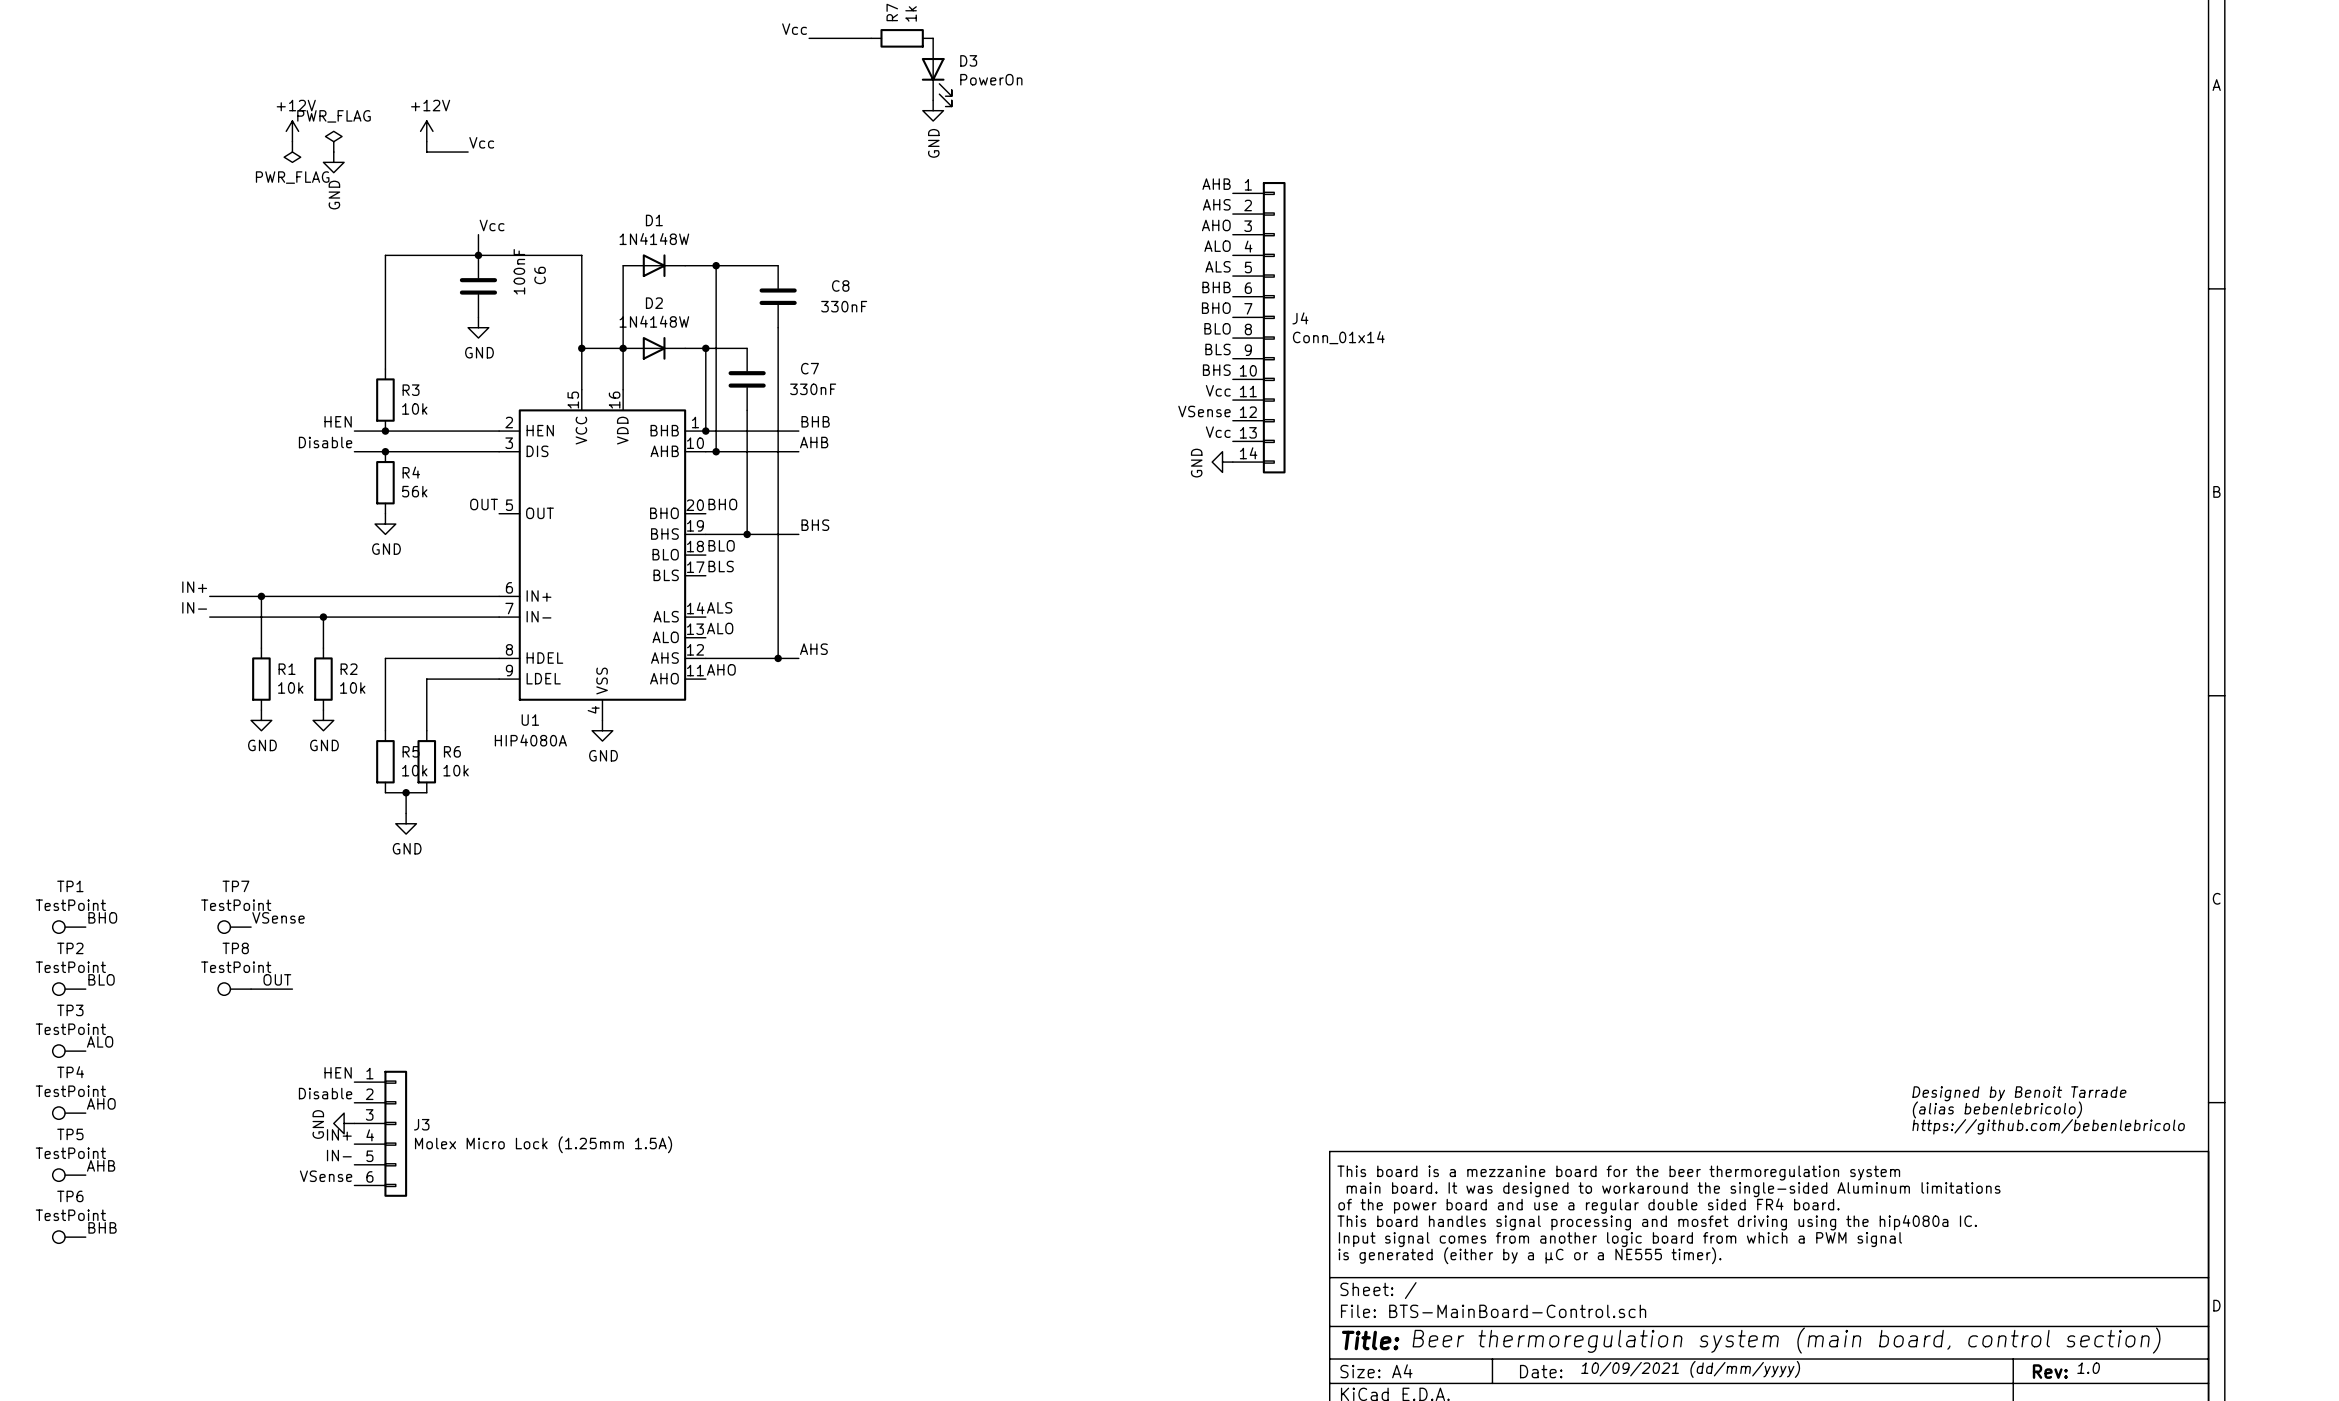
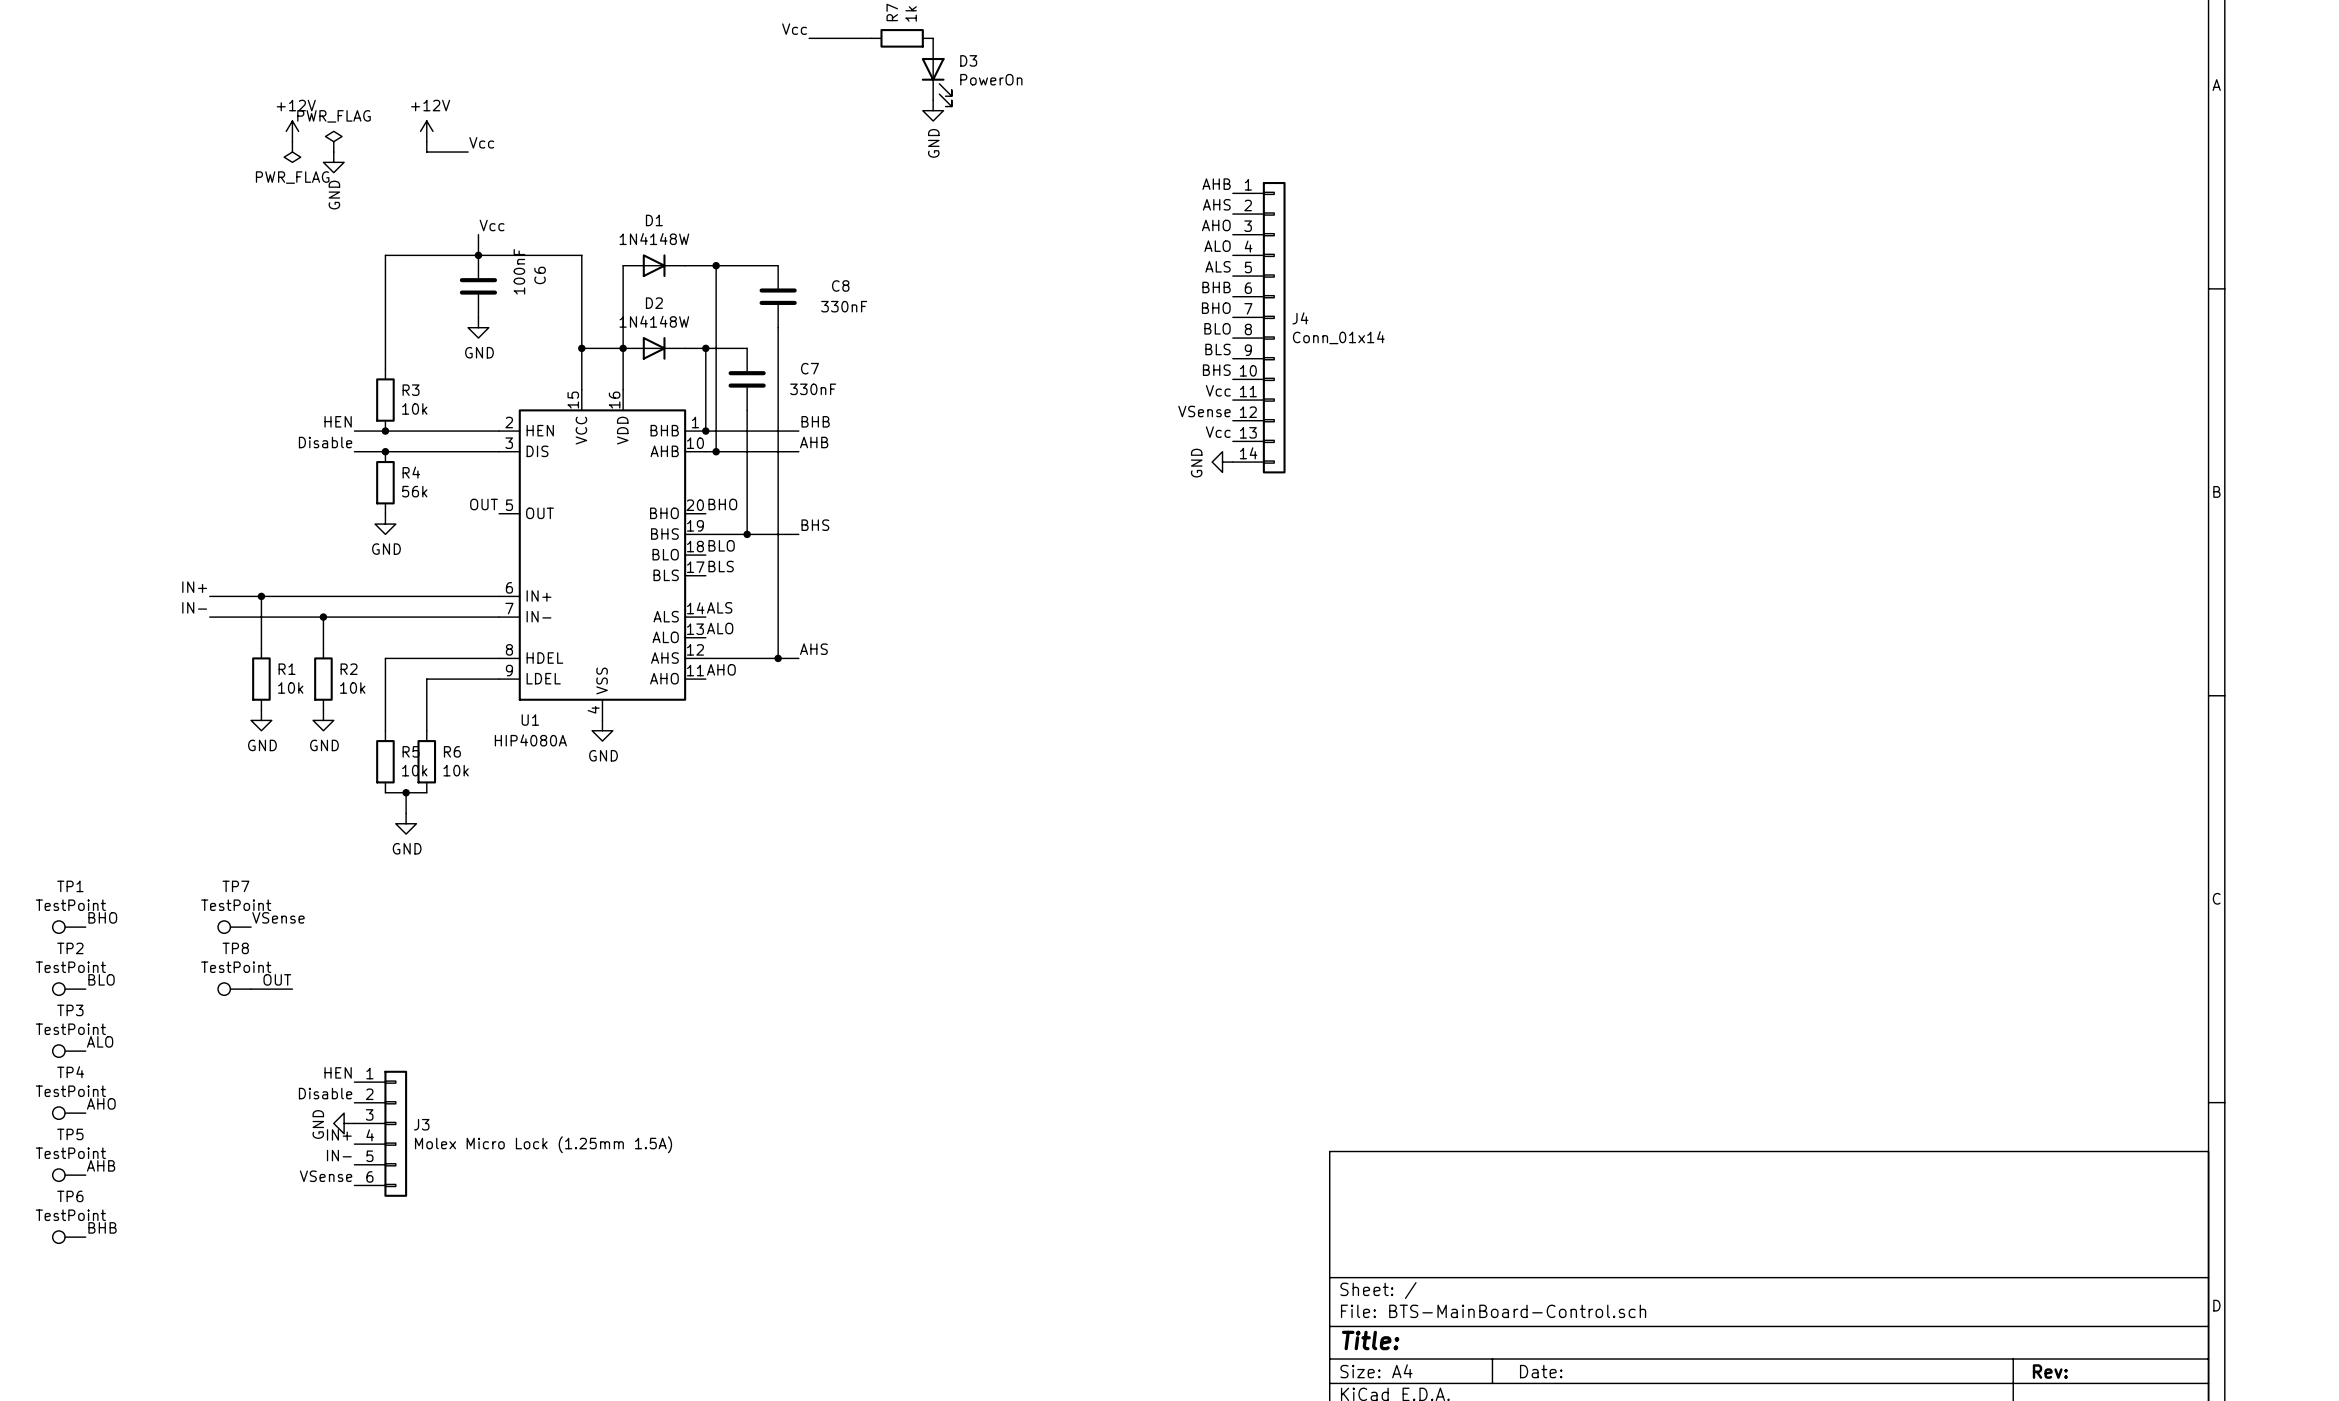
text: Designed by Benoit Tarrade (2019, 1093) -> none
text: (alias bebenlebricolo) (1997, 1109) -> none
text: https://github.com/bebenlebricolo (2048, 1126) -> none
text: This board is a mezzanine board for the beer thermoregulation system (1618, 1173) -> none
text: main board. It was designed to workaround the single-sided Aluminum limitations (1673, 1189) -> none
text: of the power board and use a regular double sided FR4 board. (1588, 1206) -> none
text: This board handles signal processing and mosfet driving using the hip4080a IC. (1657, 1222) -> none
text: Input signal comes from another logic board from which a PWM signal (1620, 1239) -> none
text: is generated (either by a µC or a NE555 timer). (1529, 1255) -> none
text: Beer thermoregulation system (main board, control section) (1786, 1340) -> none
text: 1.0 (2088, 1368) -> none
text: 10/09/2021 (dd/mm/yyyy) (1690, 1369) -> none

